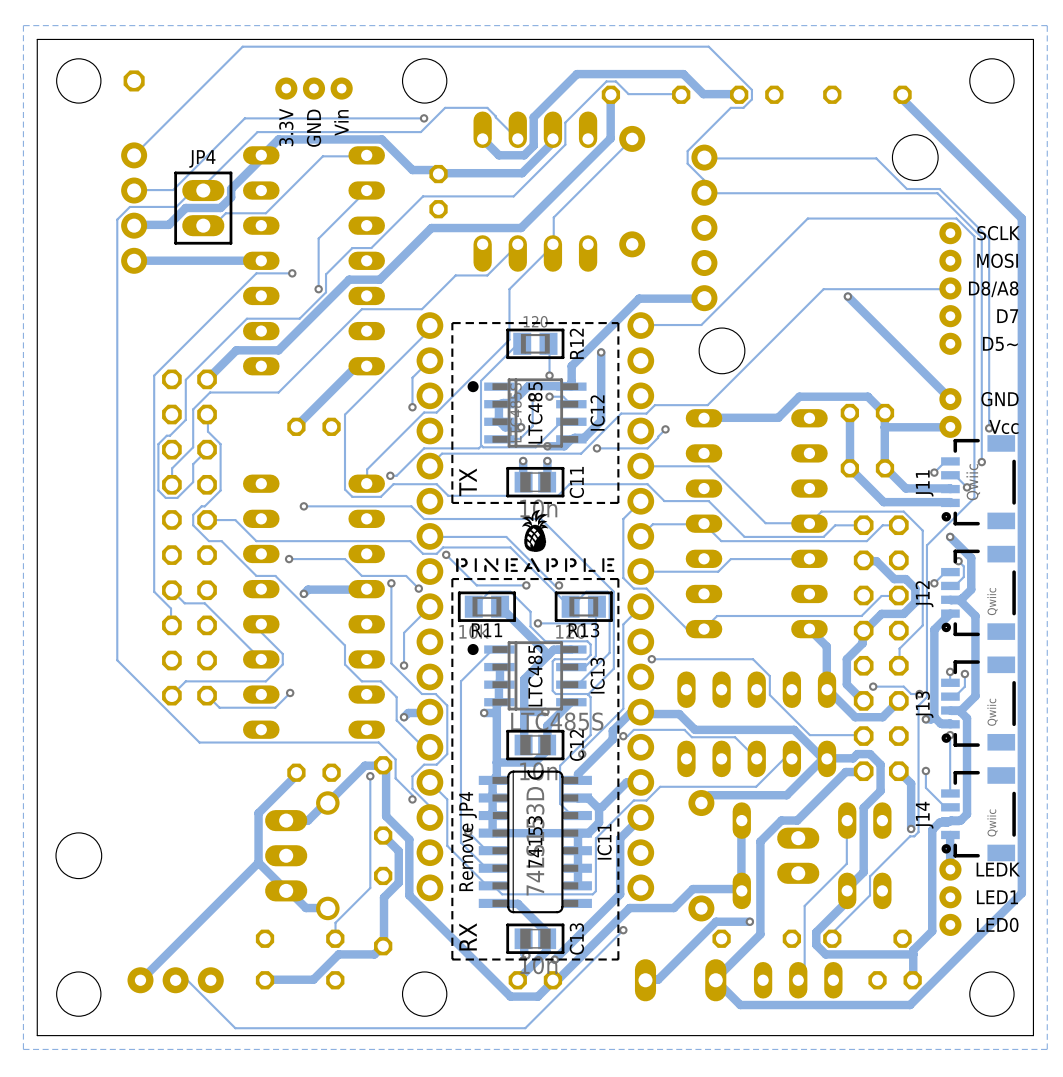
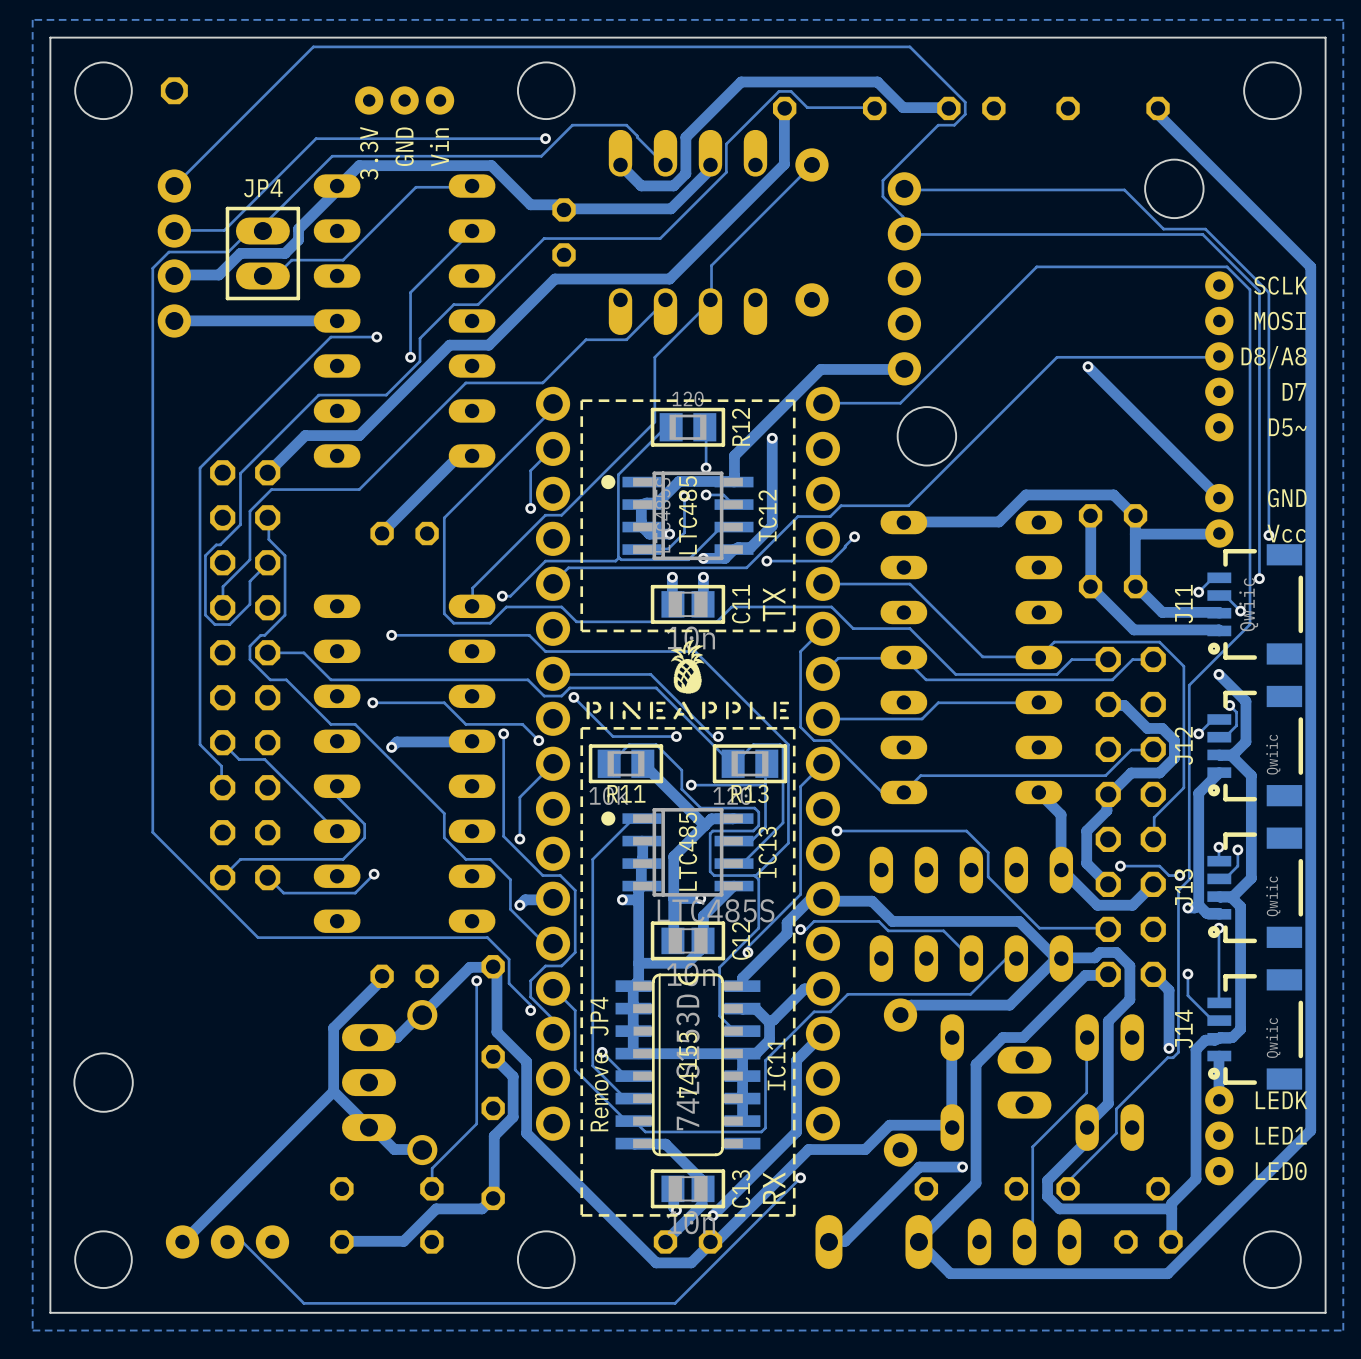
text position: TX (468, 482) -> TX (774, 604)
text position: RX (468, 936) -> RX (774, 1188)

